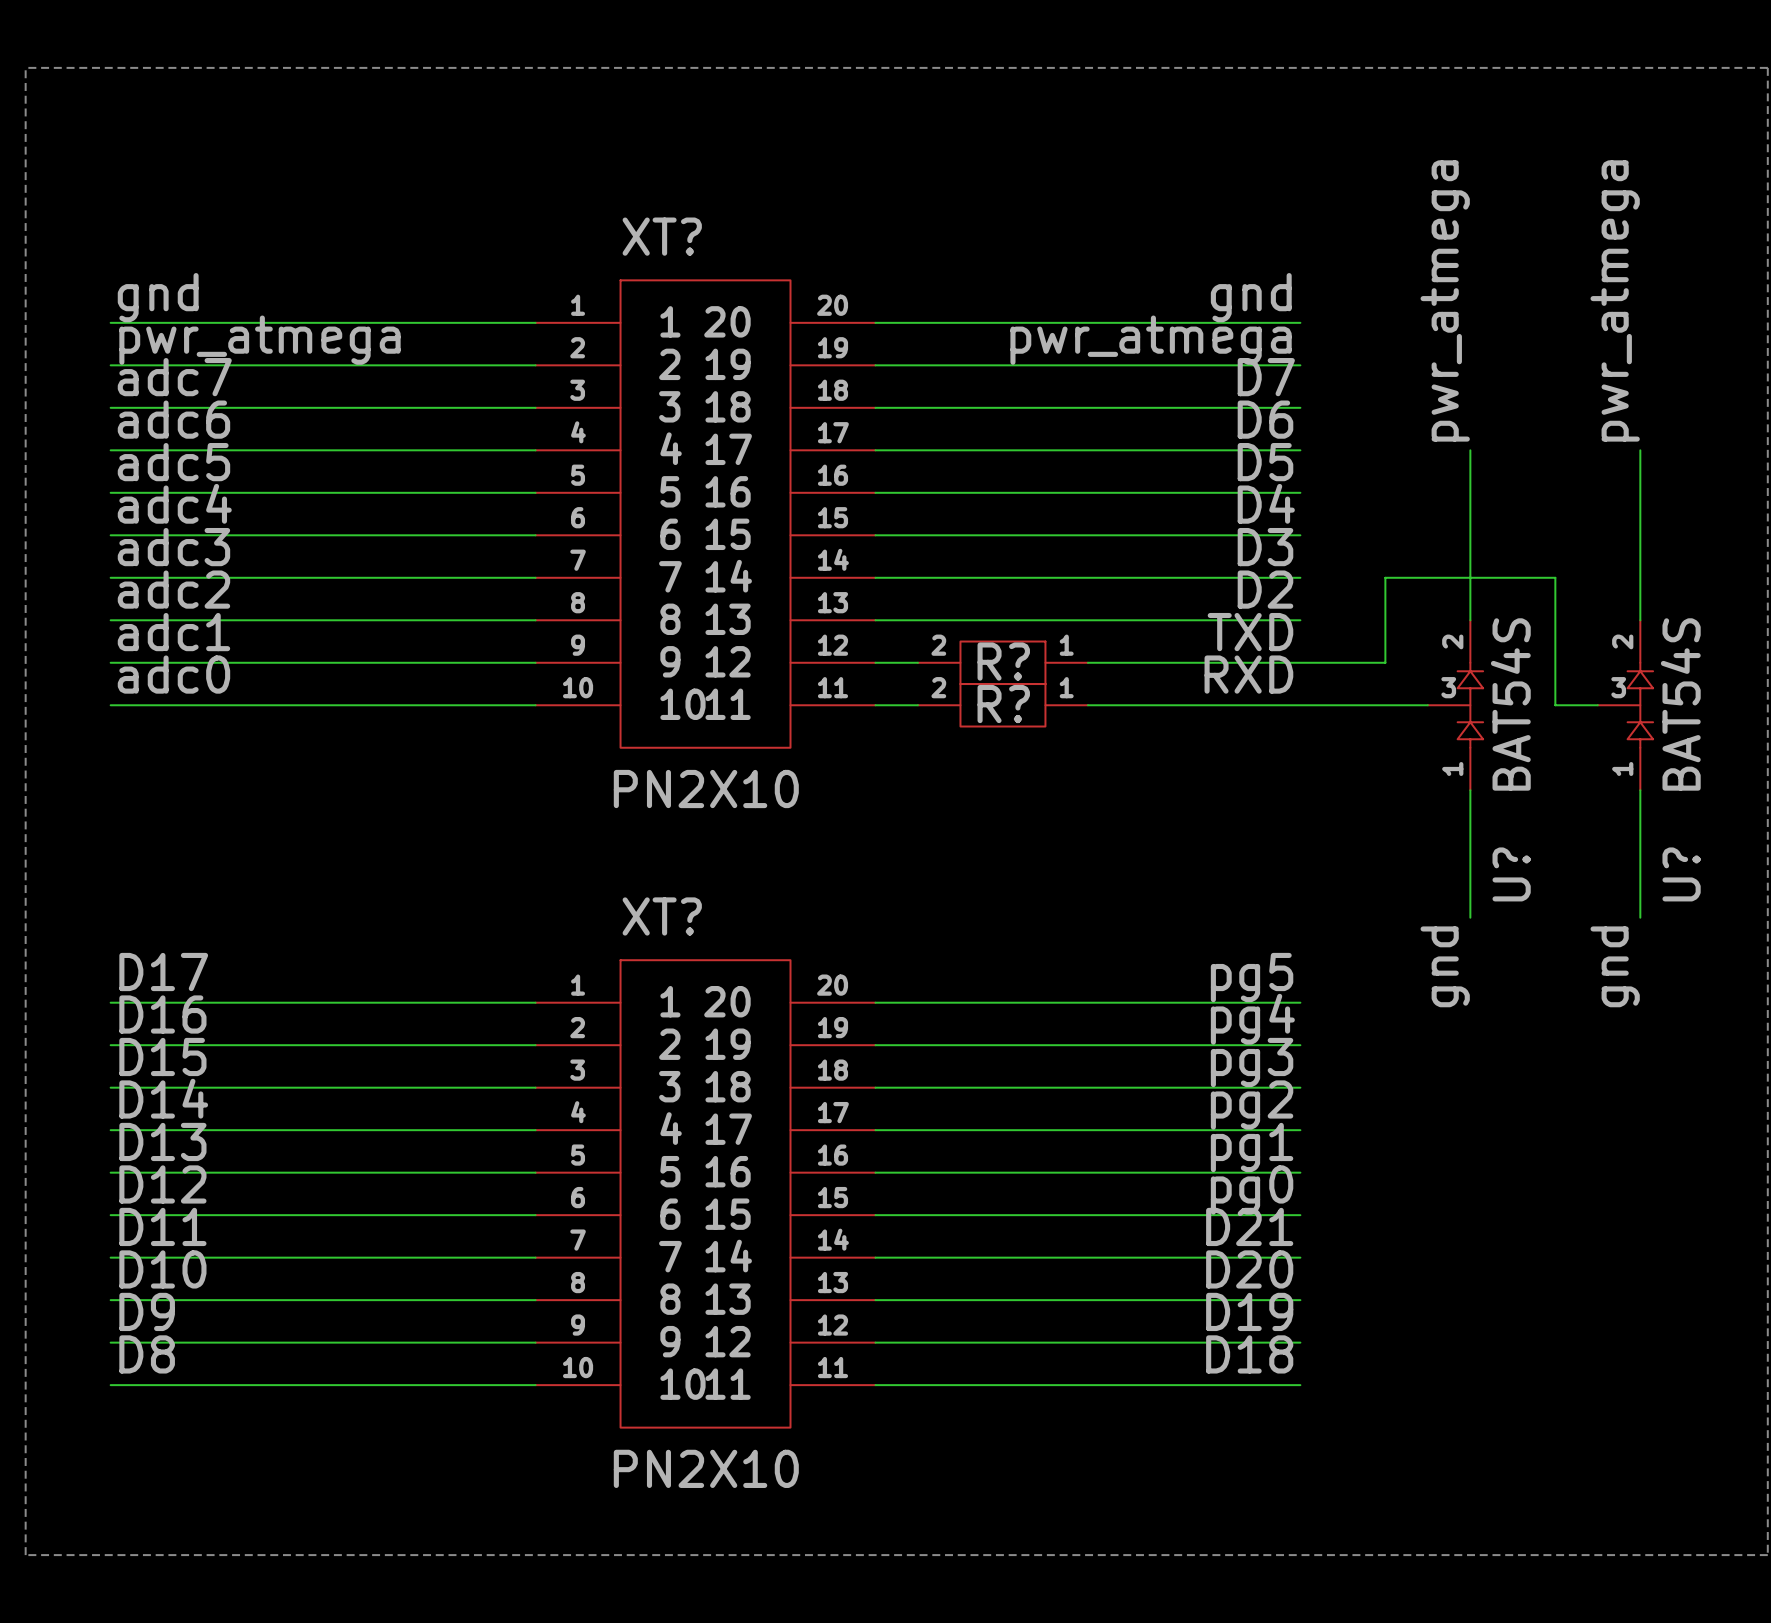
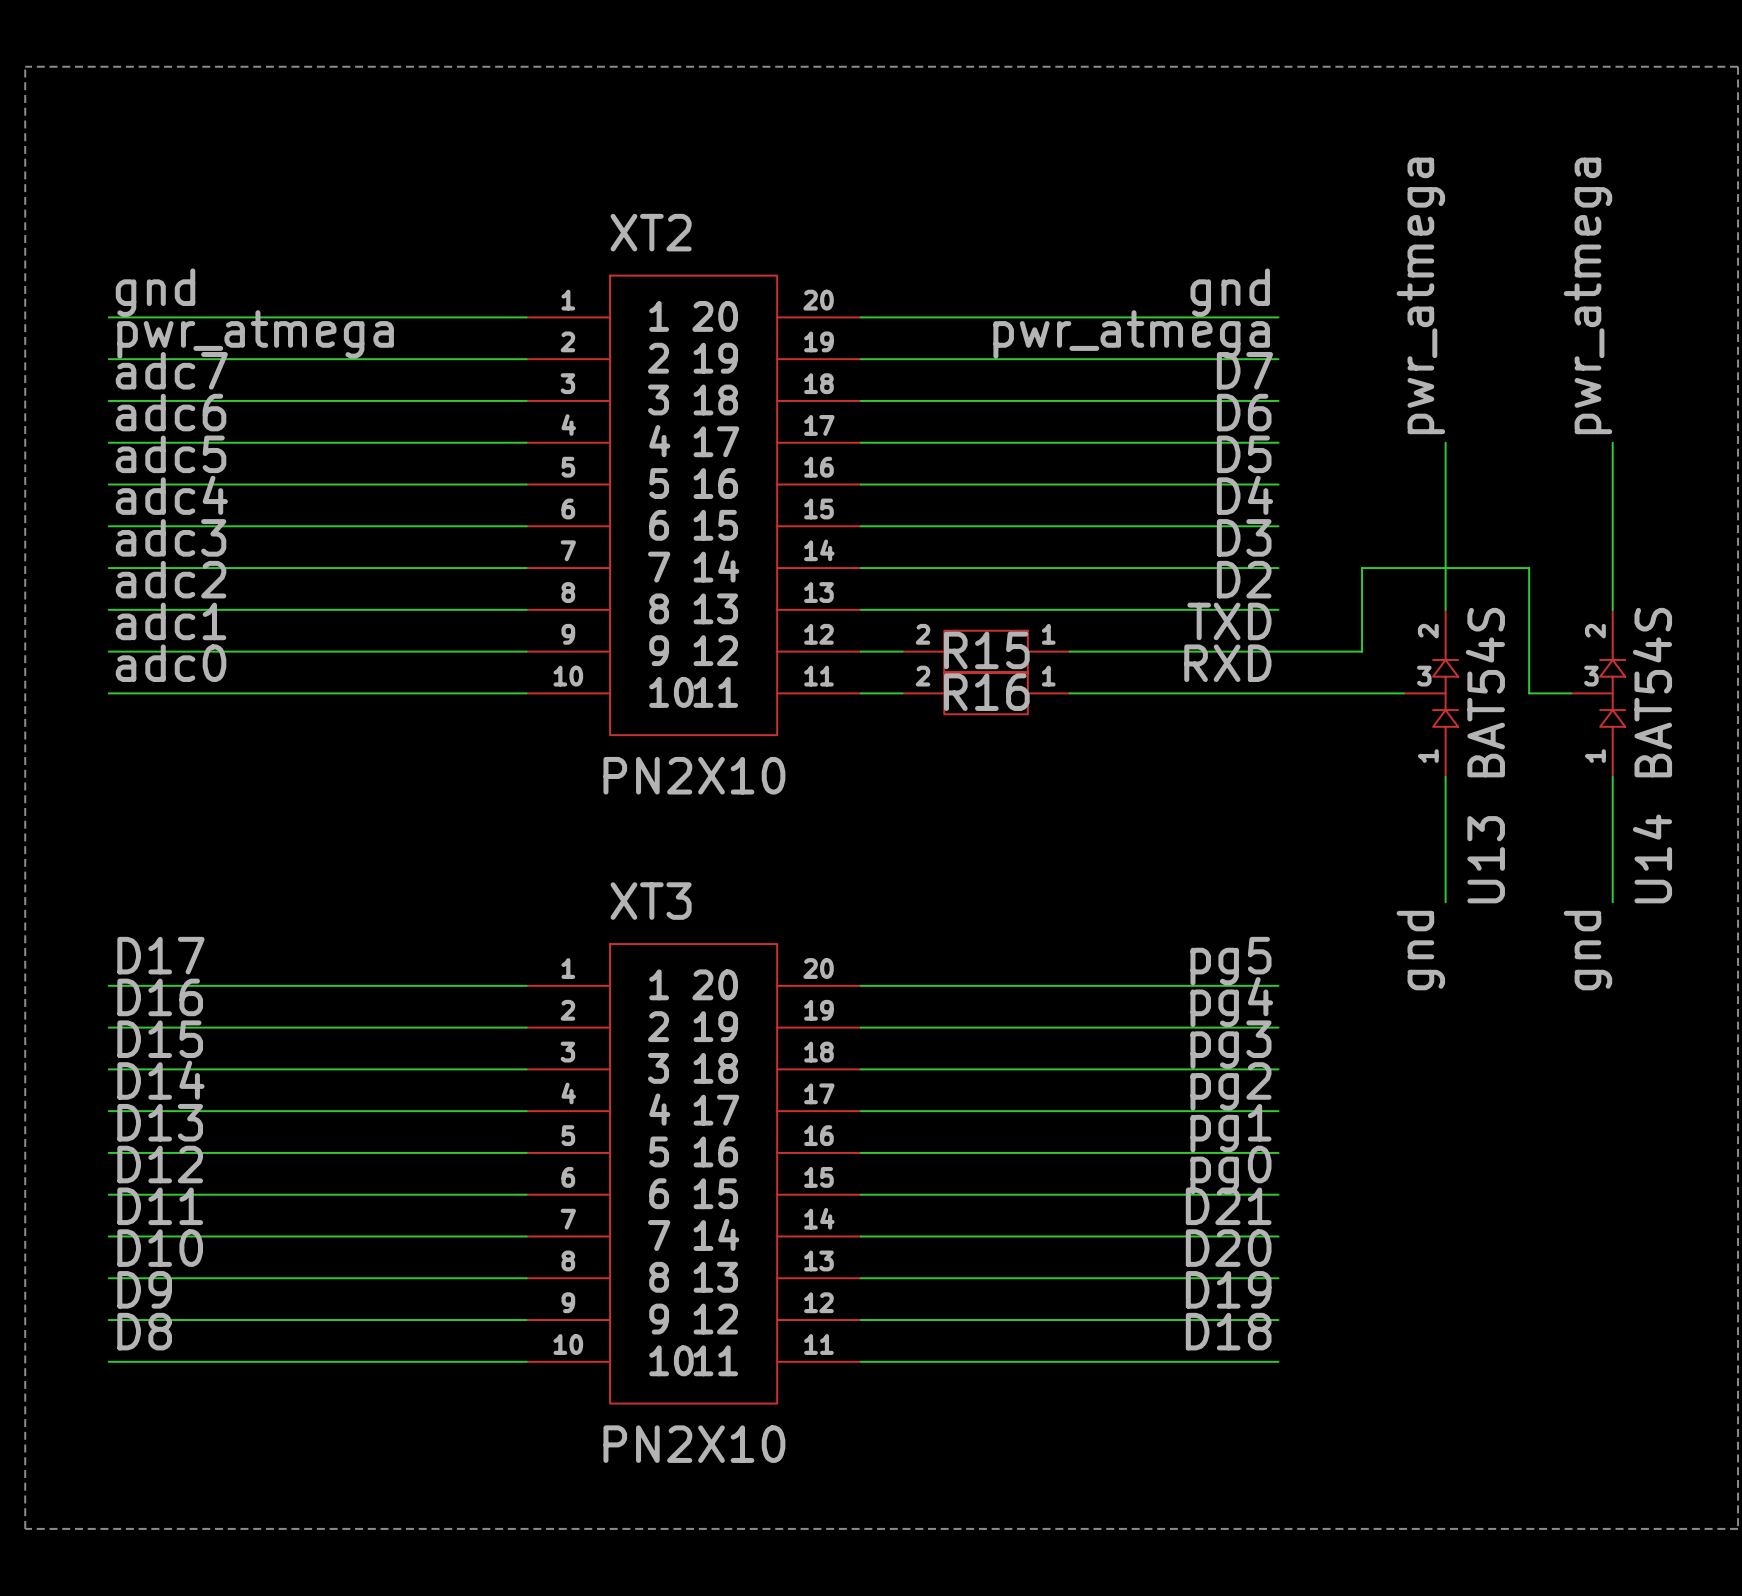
XT? name: XT? (662, 236) -> XT2 (651, 232)
R? name: R? (1003, 661) -> R15 (986, 650)
R? name: R? (1003, 704) -> R16 (986, 692)
U? name: U? (1511, 874) -> U13 (1486, 859)
U? name: U? (1681, 874) -> U14 (1652, 858)
XT? name: XT? (662, 916) -> XT3 (651, 901)

